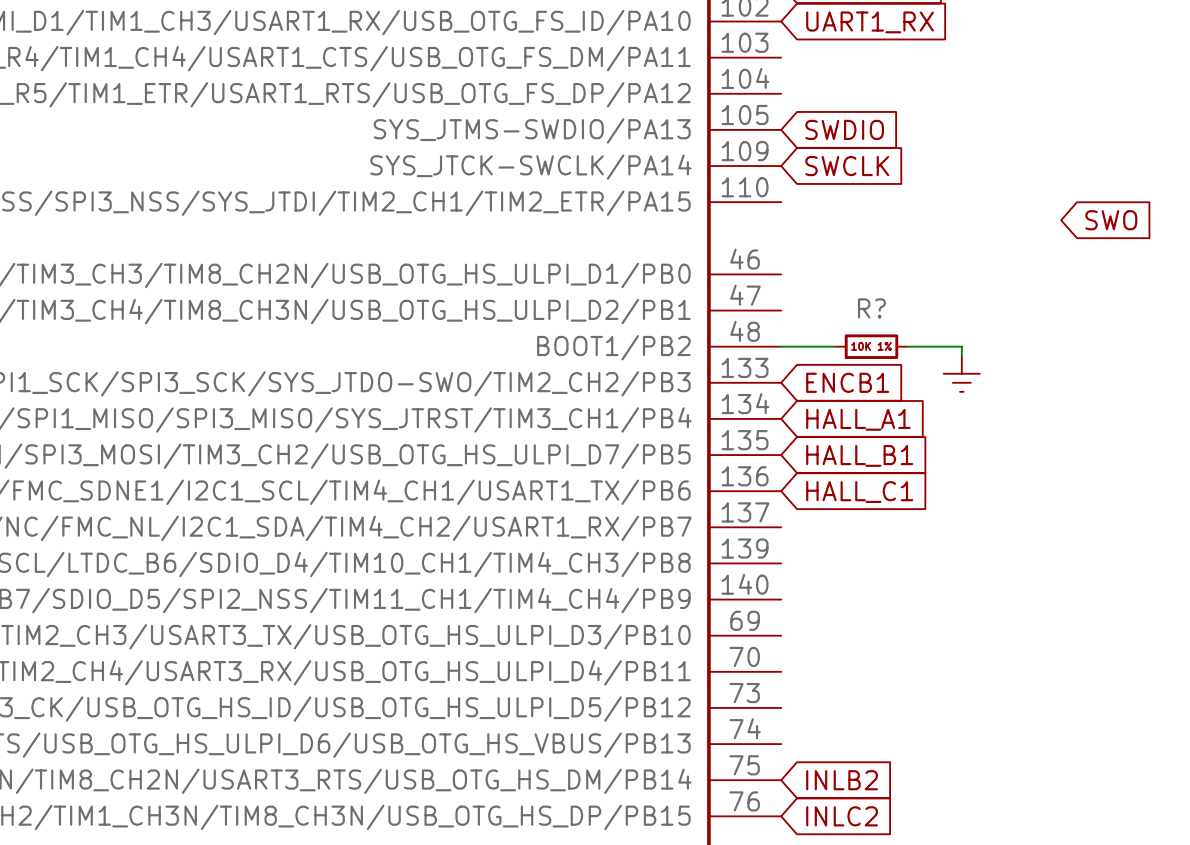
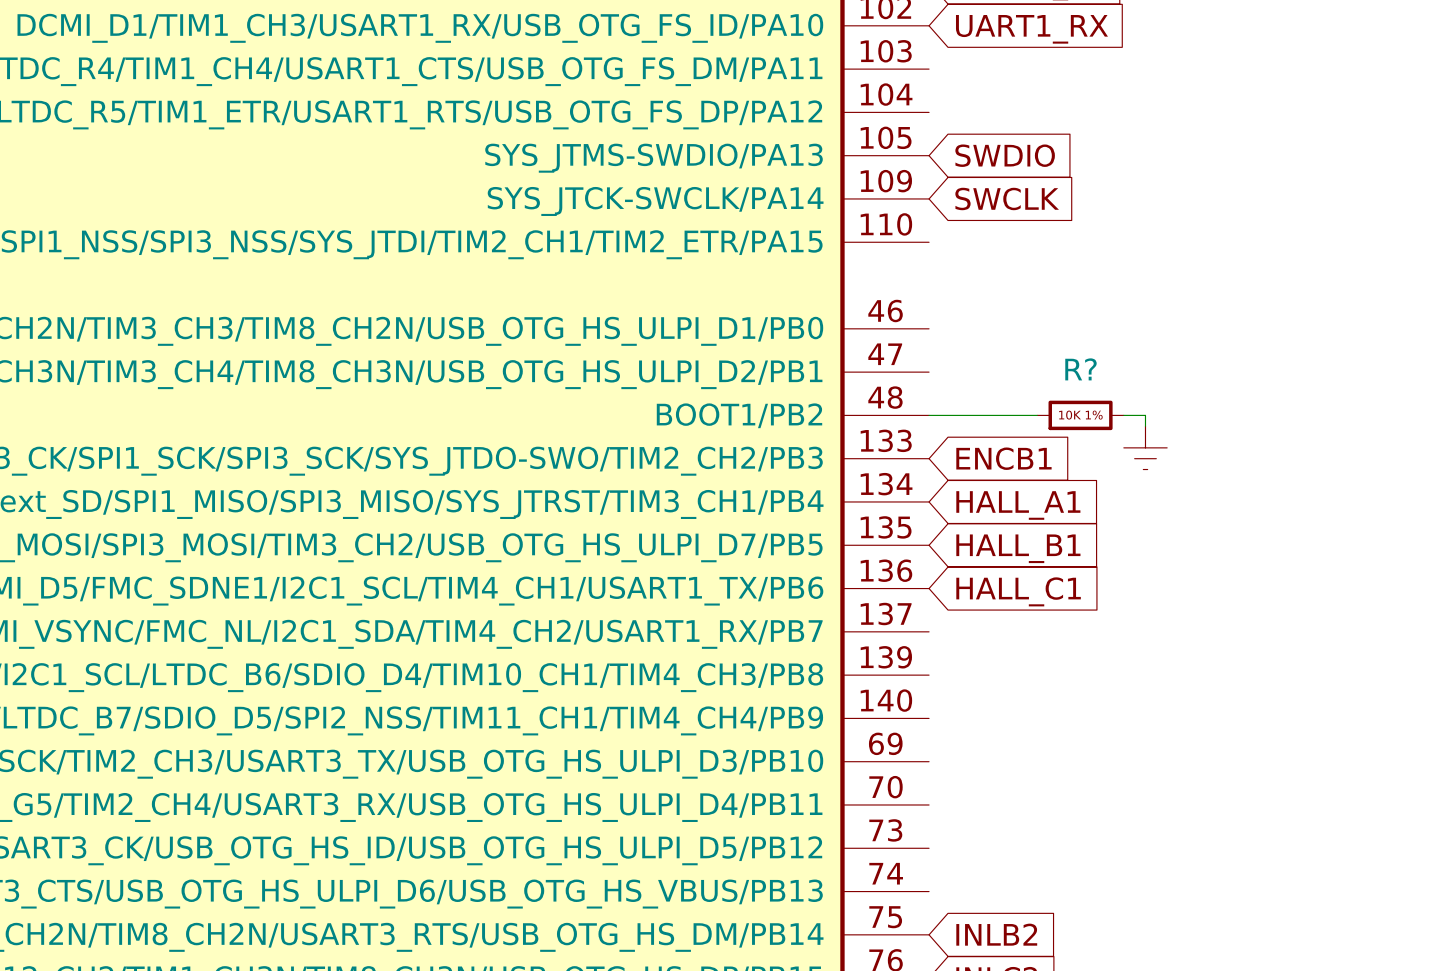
global label: SWO (1111, 220) -> none
R? position: (871, 346) -> (1080, 415)
wire: (907, 346) (943, 346) -> (993, 415) (1037, 415)

